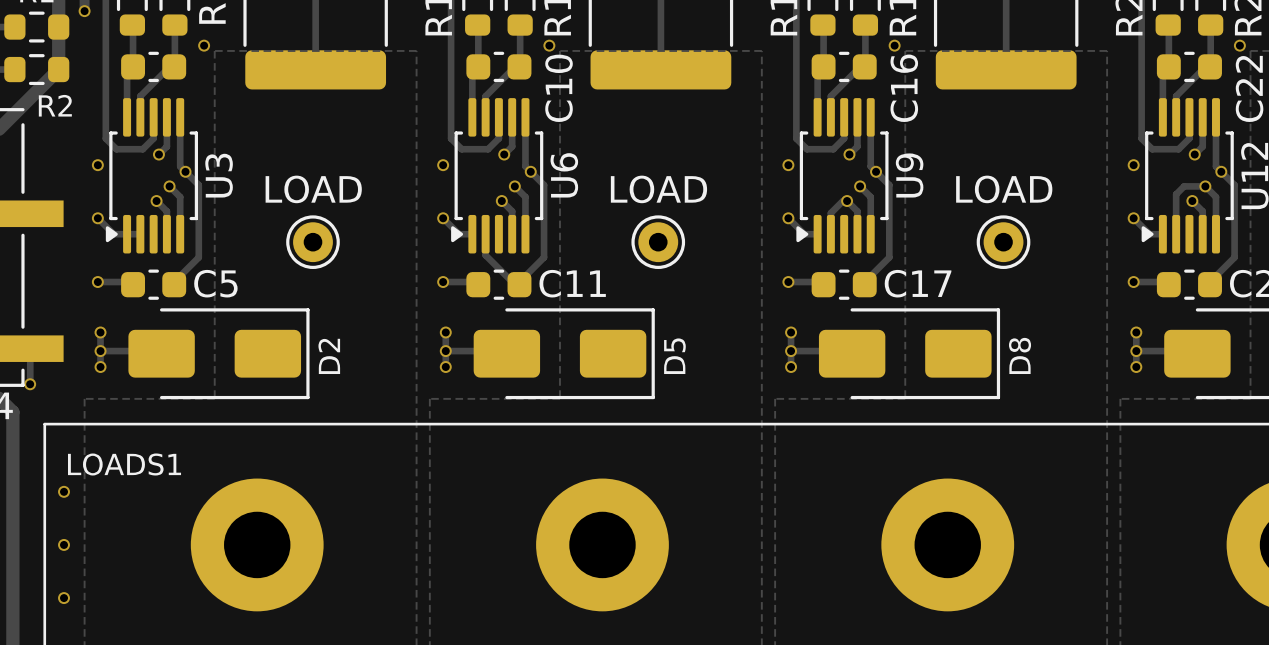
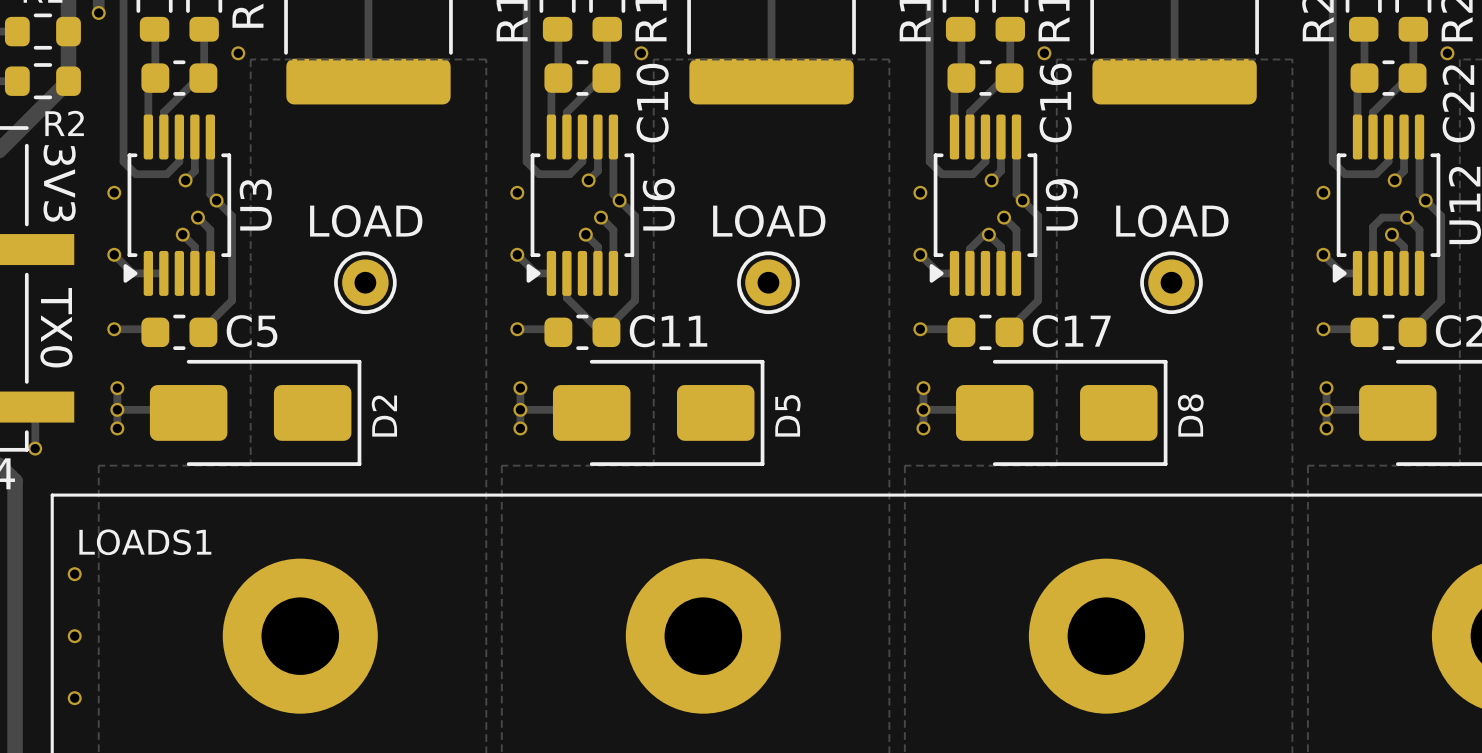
text: none -> 3V3 (59, 183)
text: none -> TX0 (56, 327)

